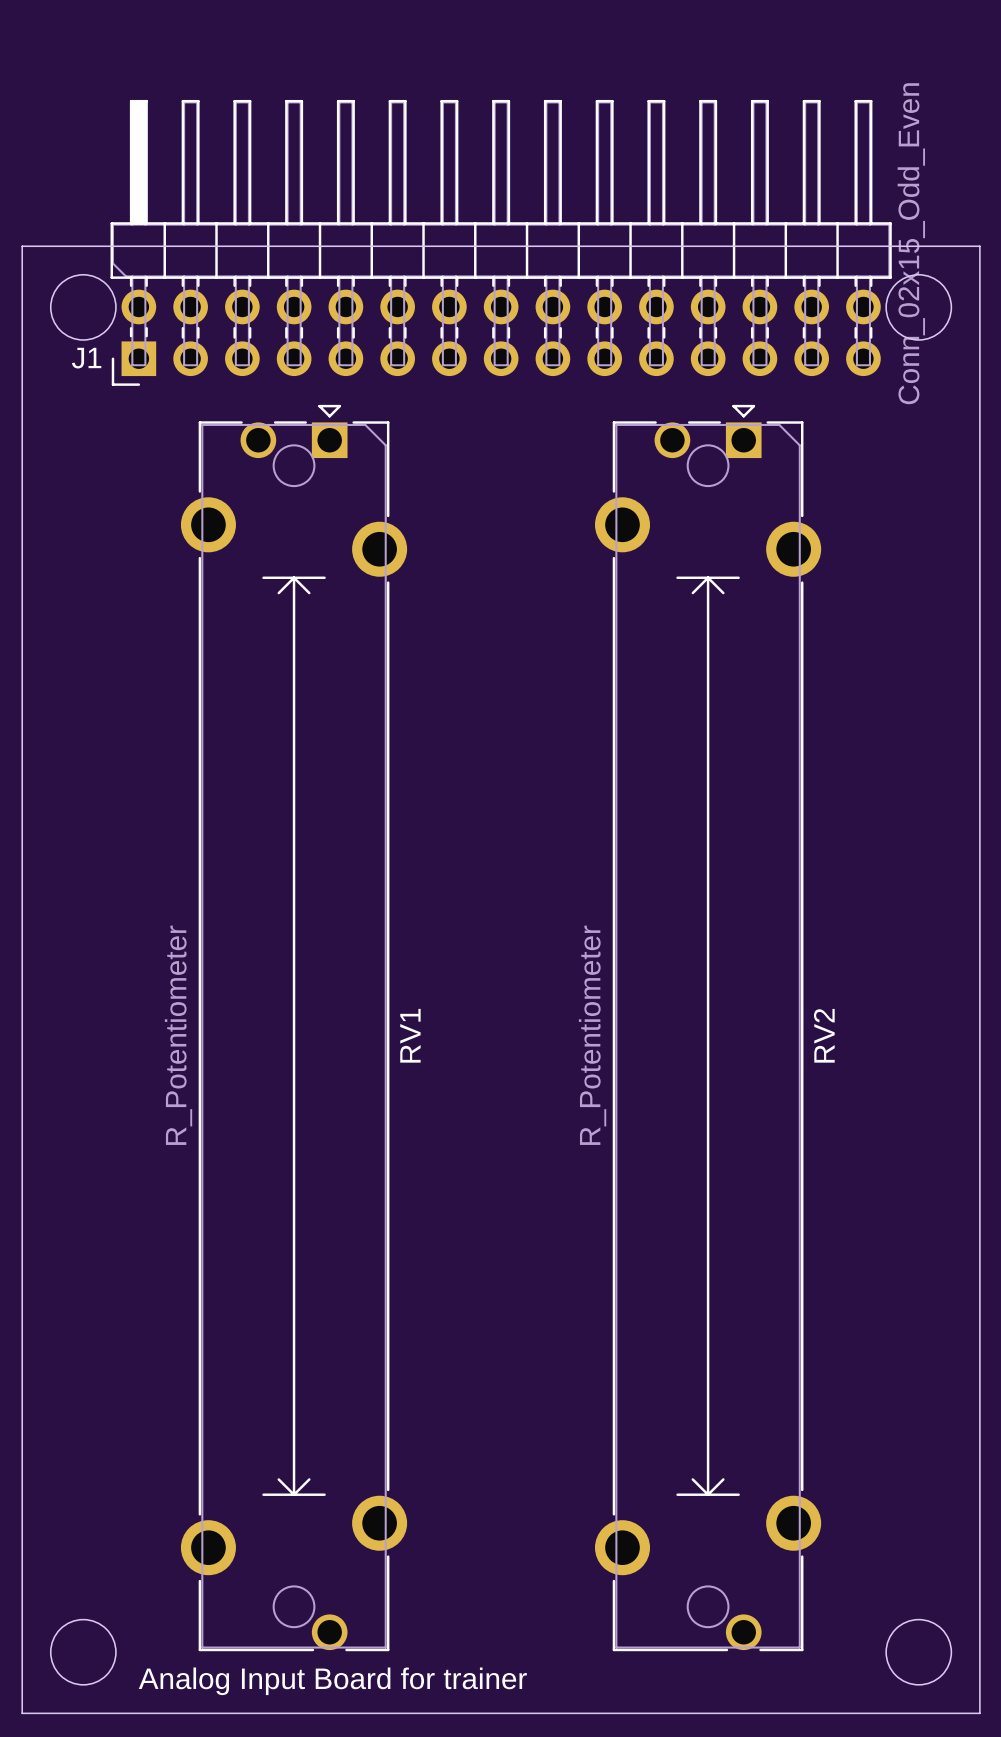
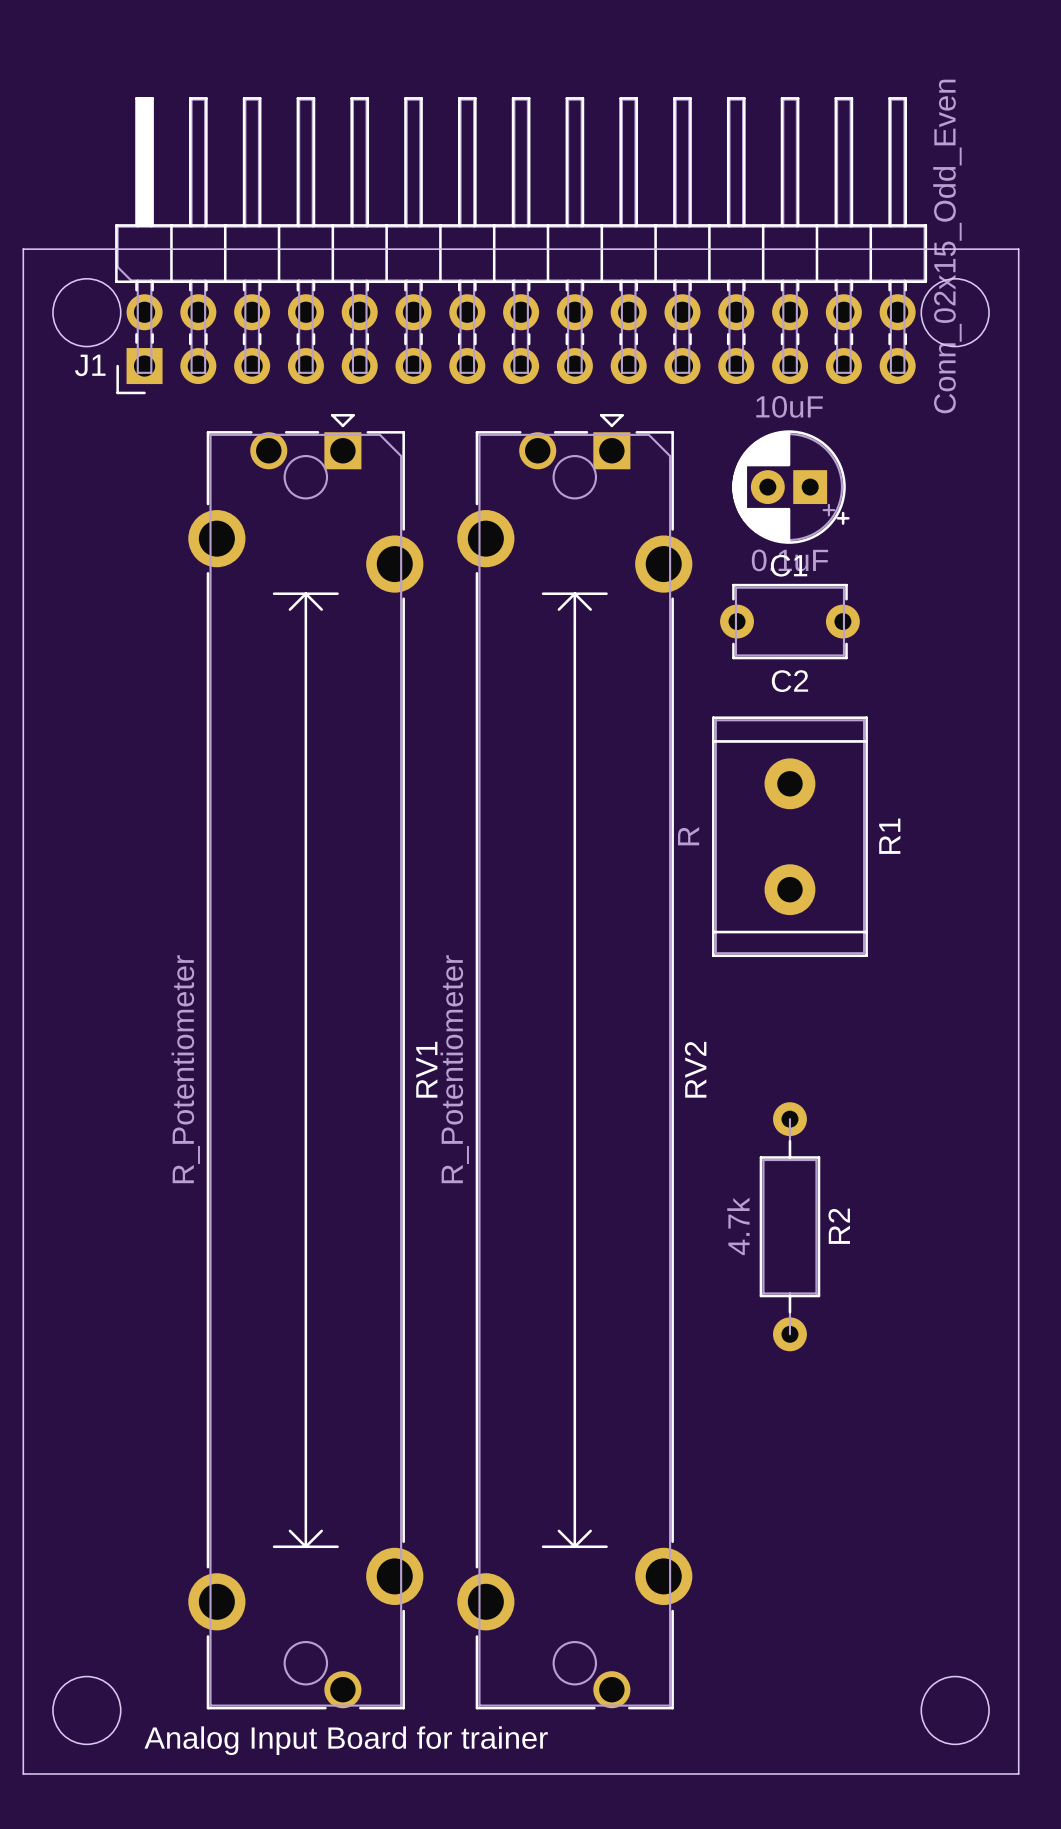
C1: none -> 10uF (790, 487)
C2: none -> 0.1uF (789, 621)
R1: none -> R (789, 836)
RV2 position: (708, 1028) -> (574, 1061)
R2: none -> 4.7k (789, 1226)

